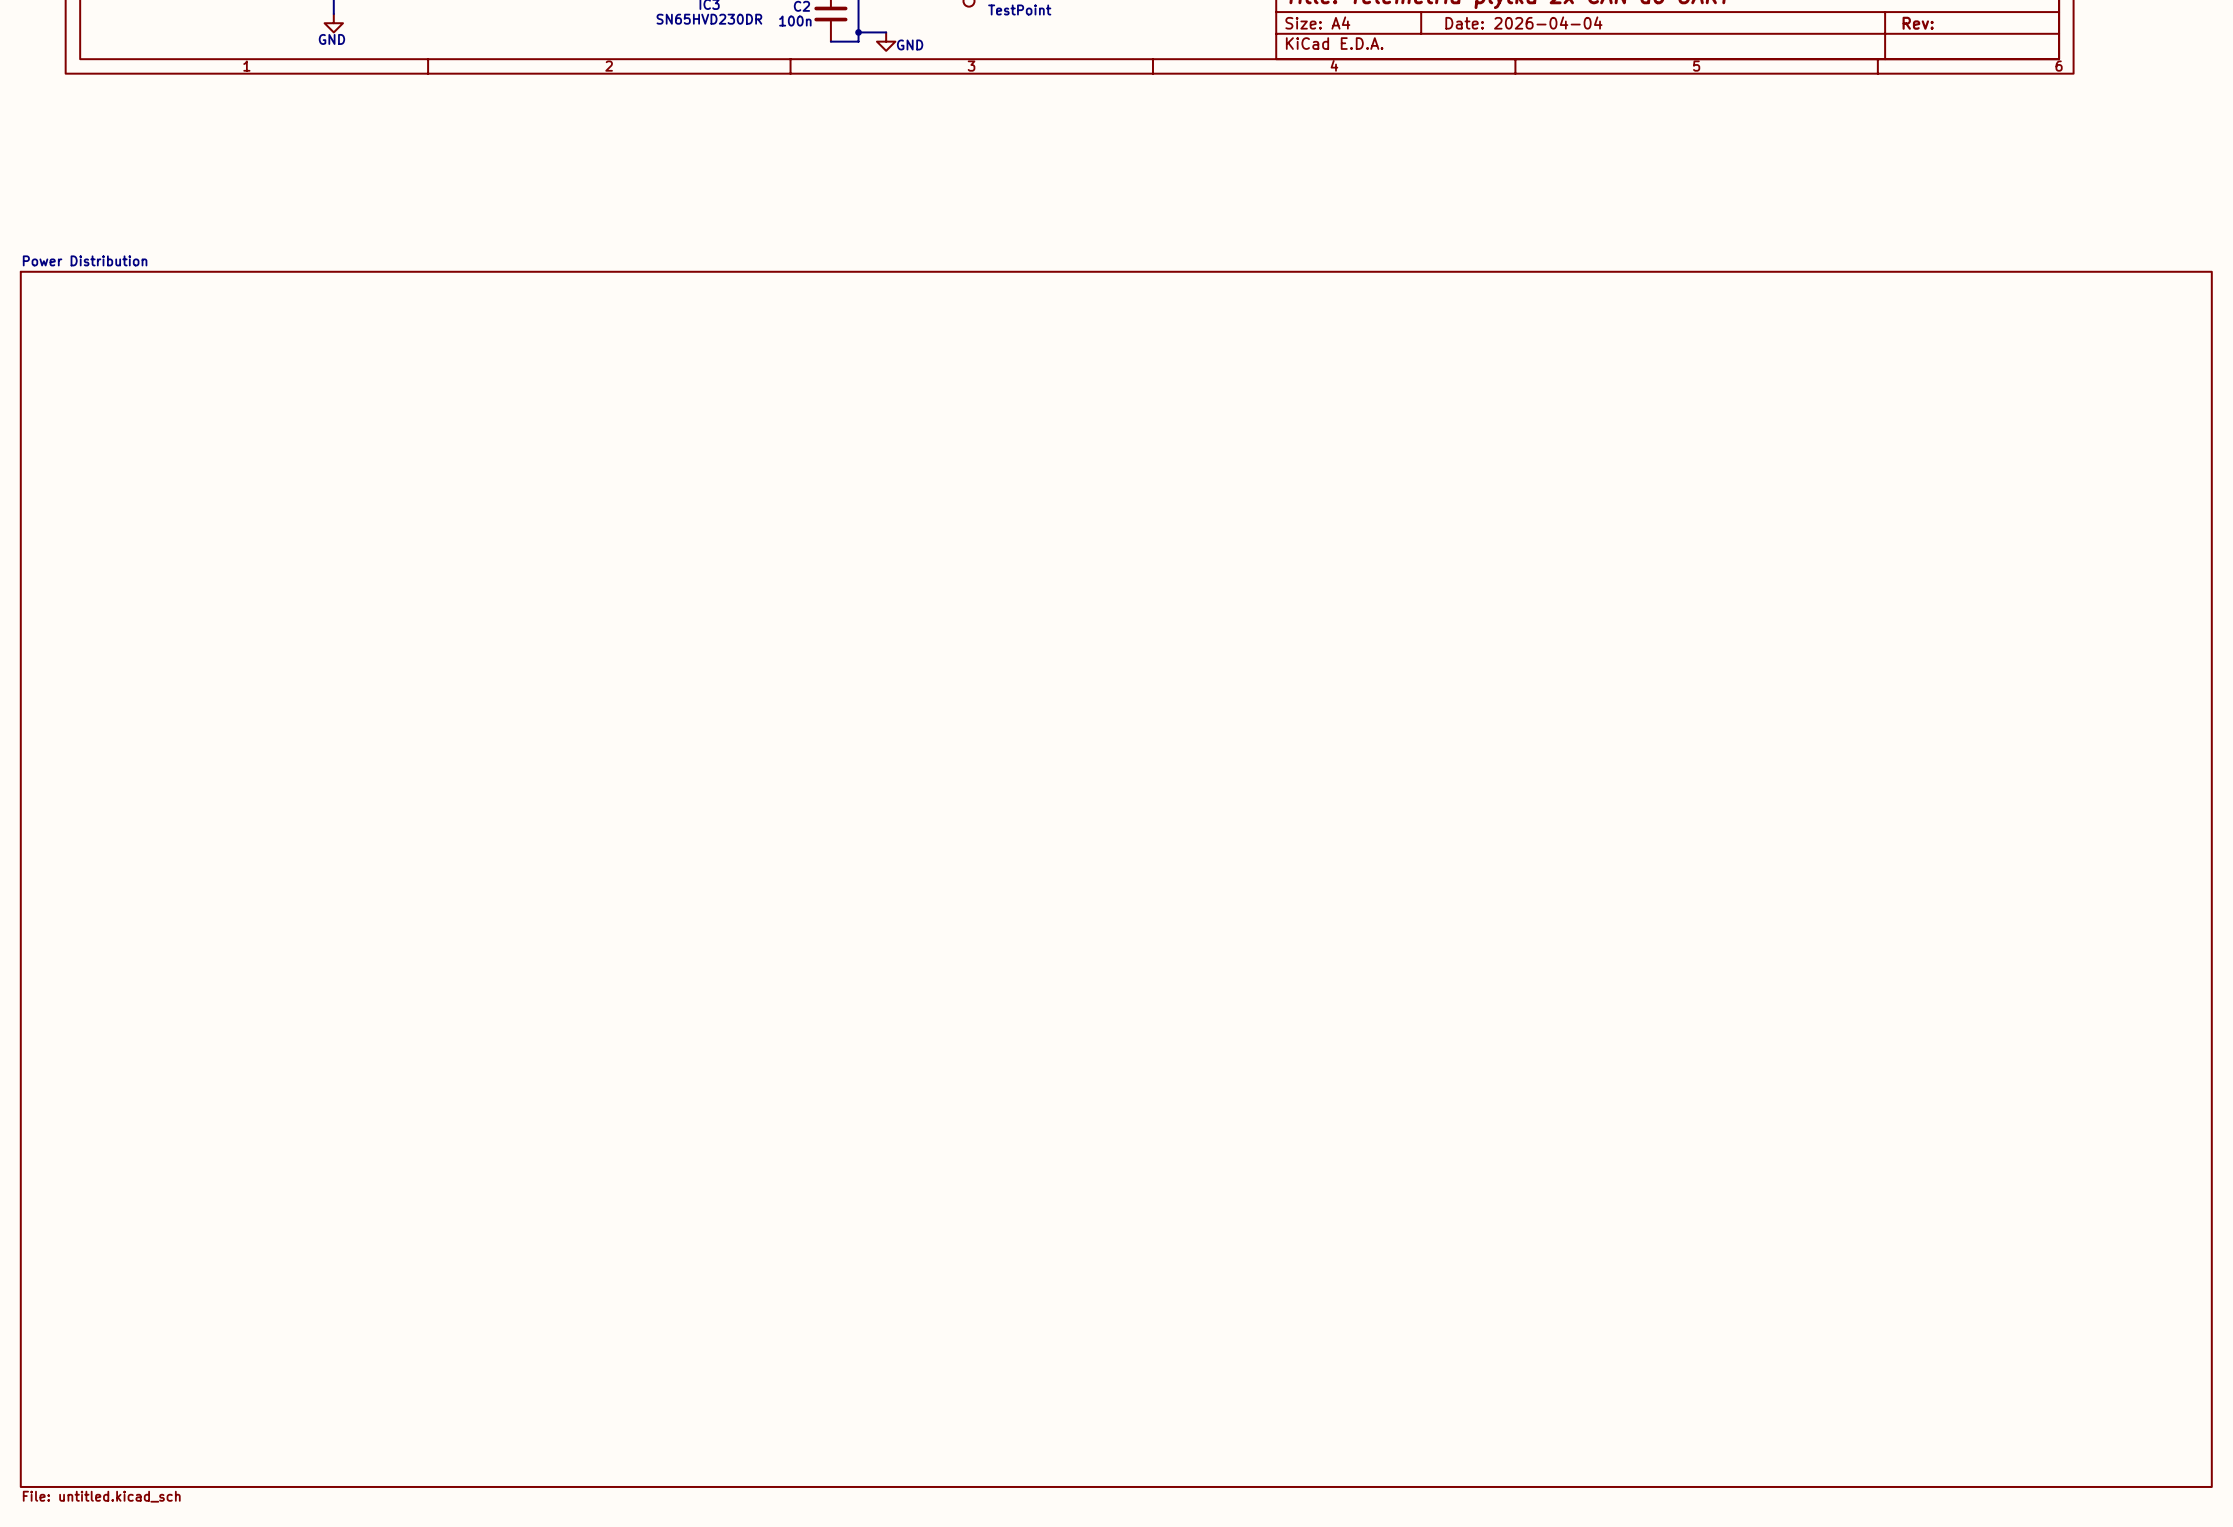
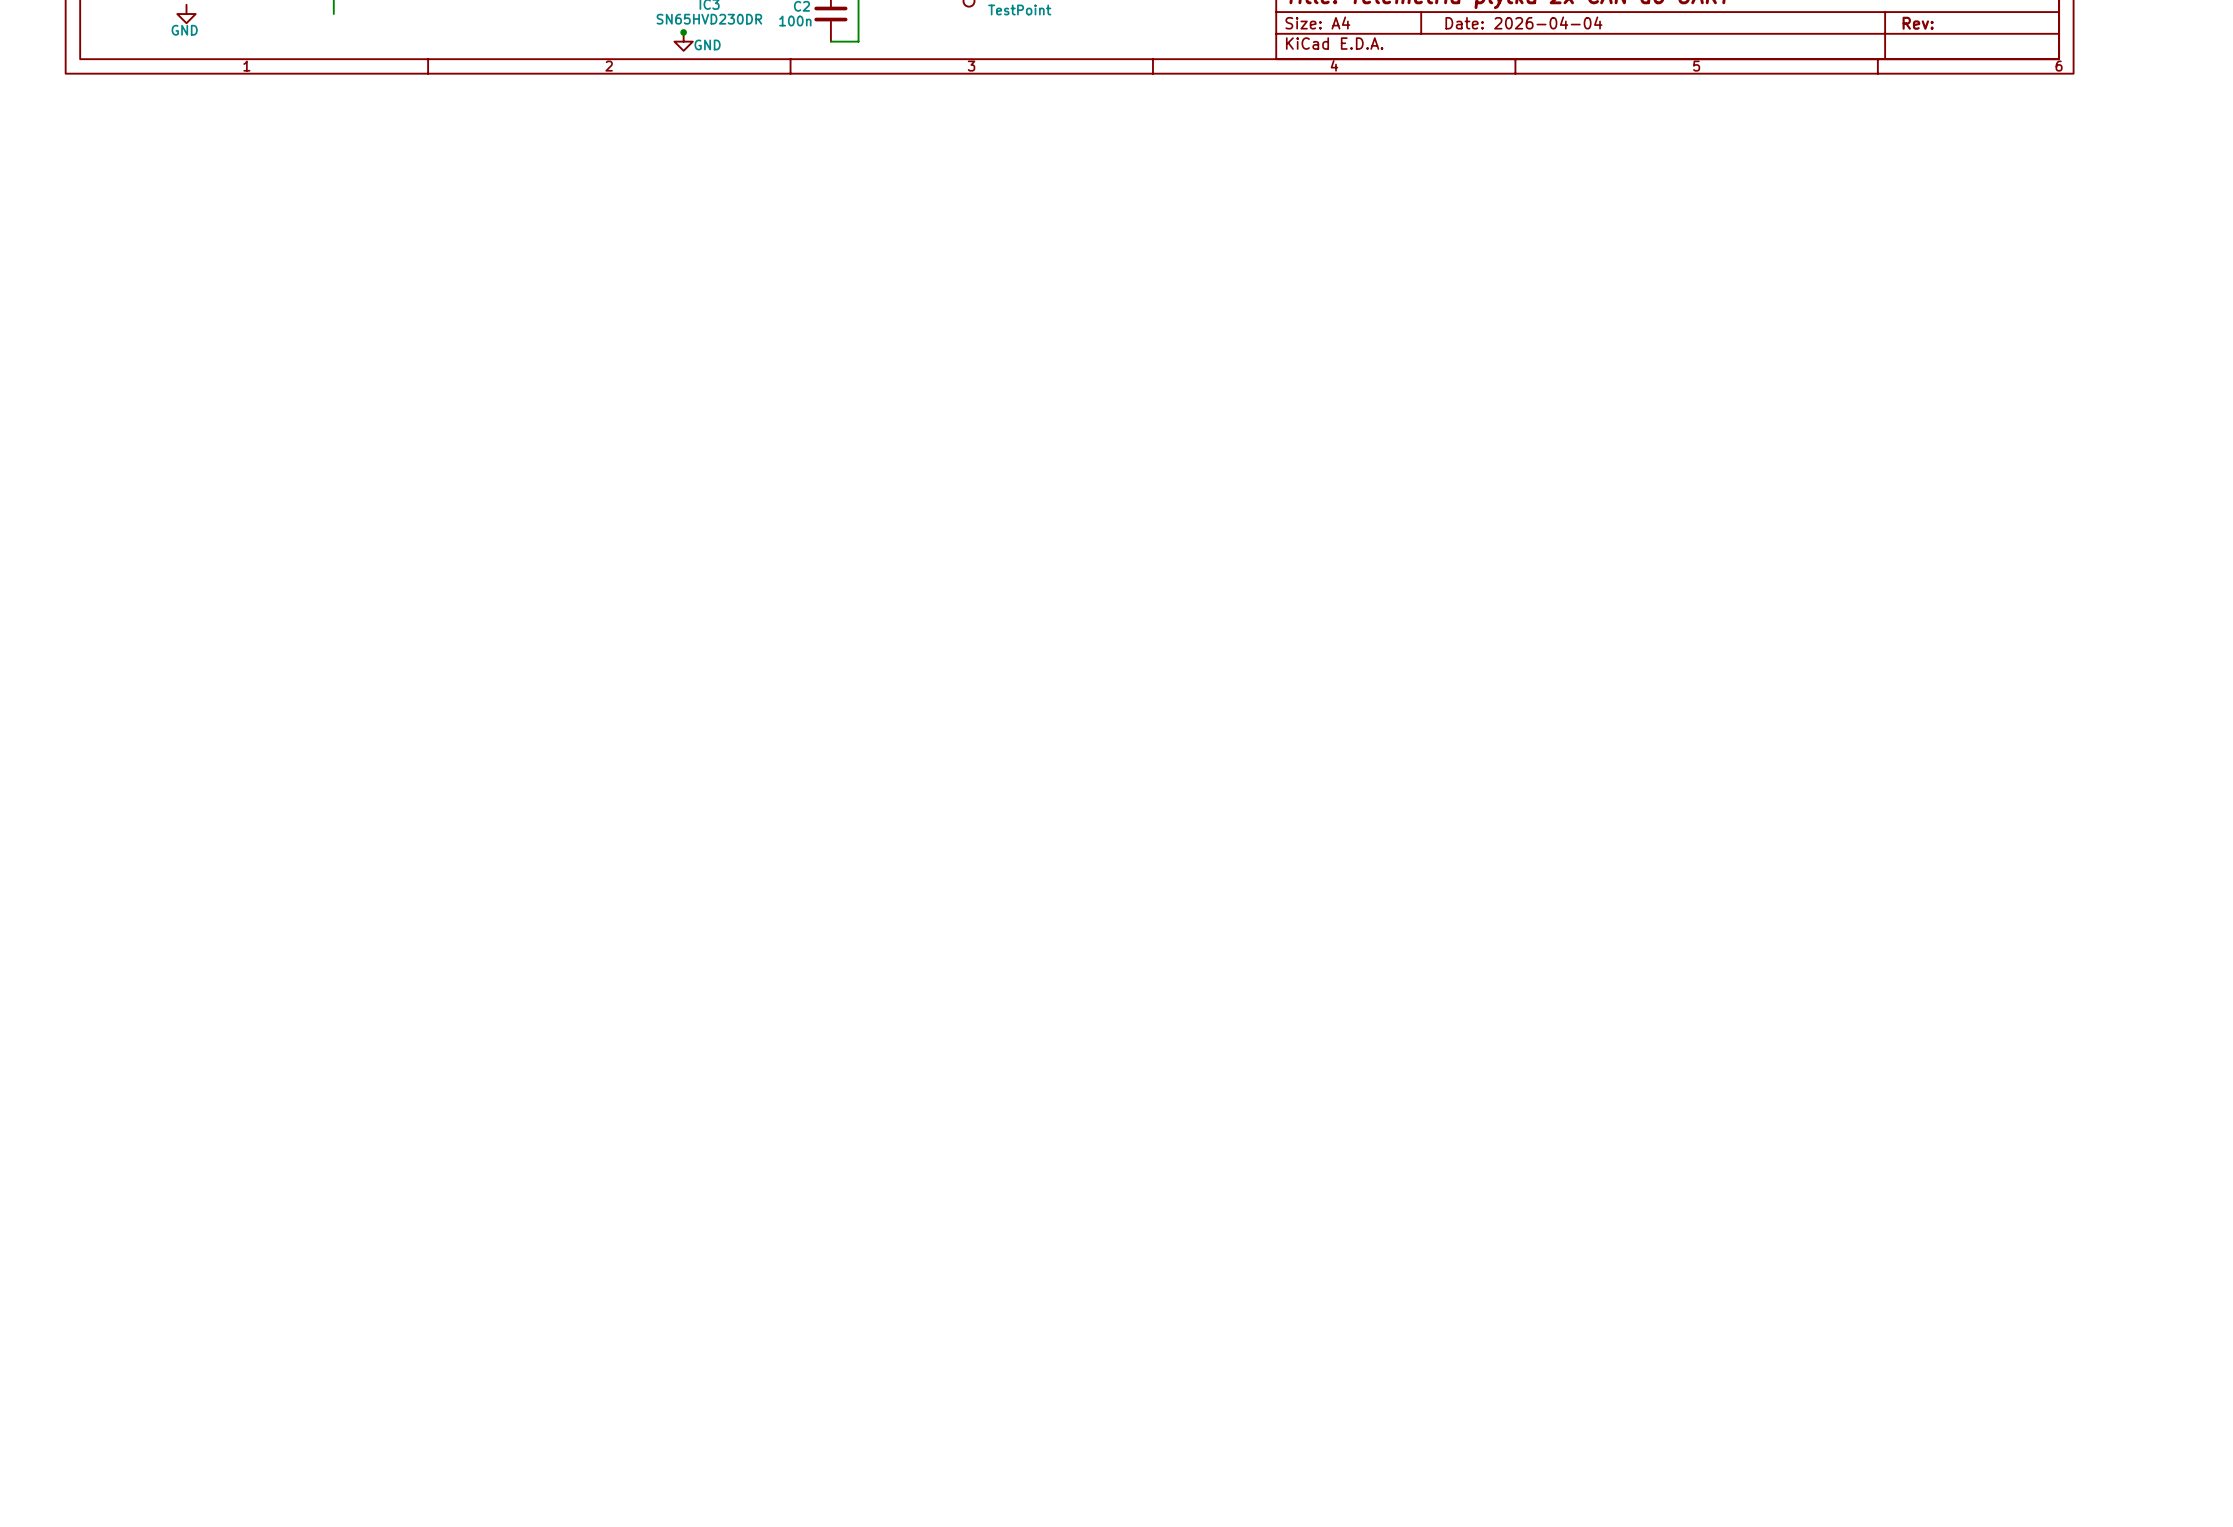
power symbol: none -> GND (186, 14)
power symbol: GND (333, 23) -> none
junction: none -> (683, 32)
wire: (858, 32) (886, 32) -> none
junction: (858, 32) -> none
power symbol: none -> GND (683, 41)
power symbol: GND (886, 41) -> none
sheet Power Distribution: File: untitled.kicad_sch (1116, 879) -> none

